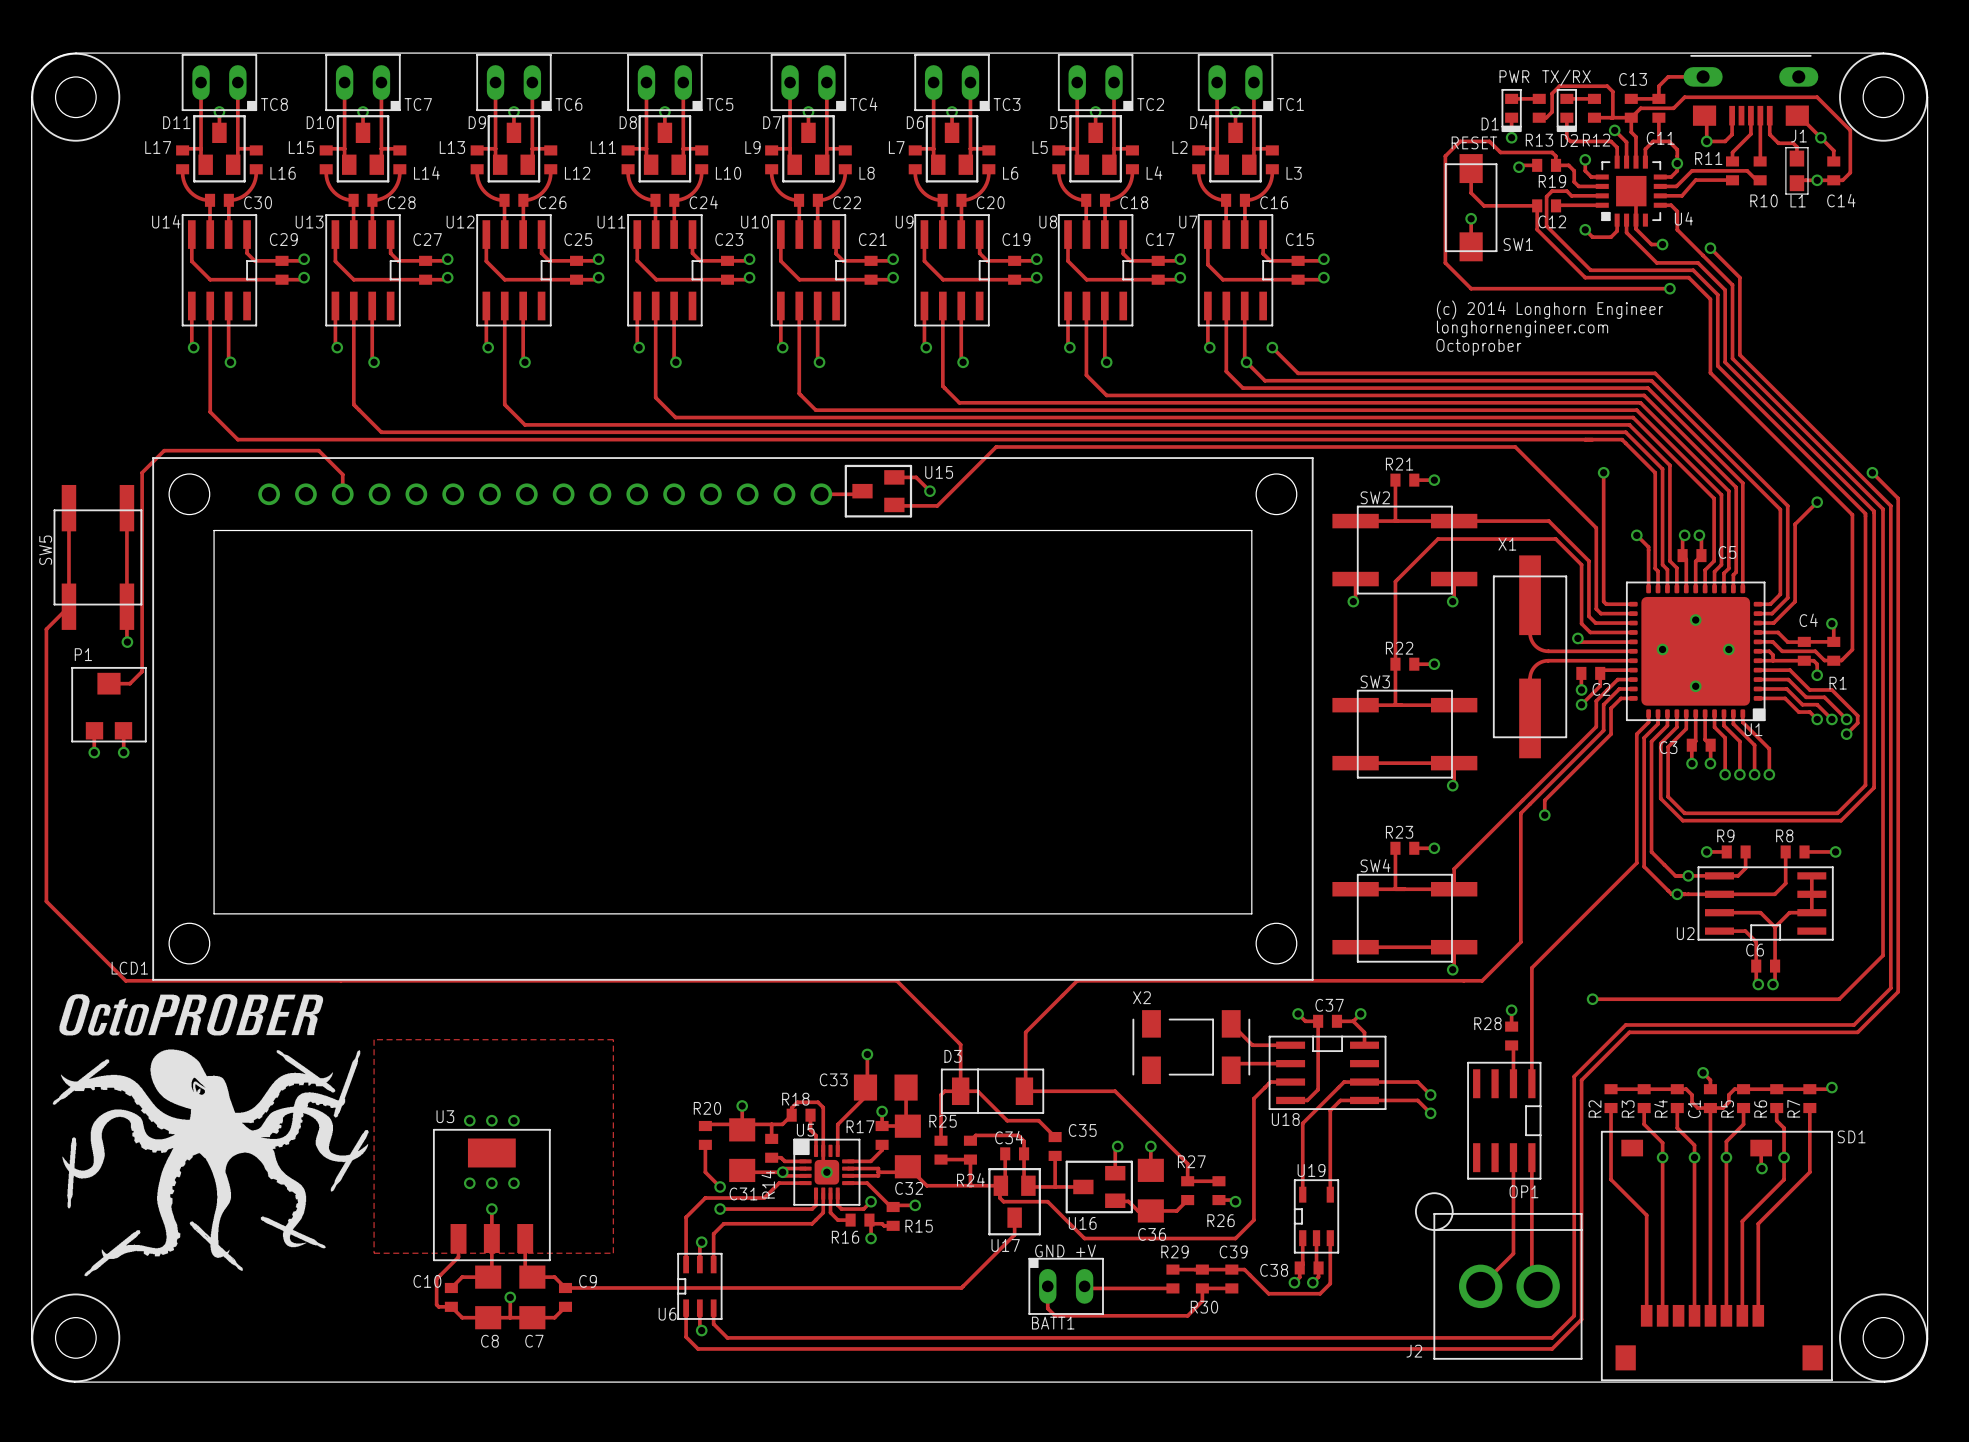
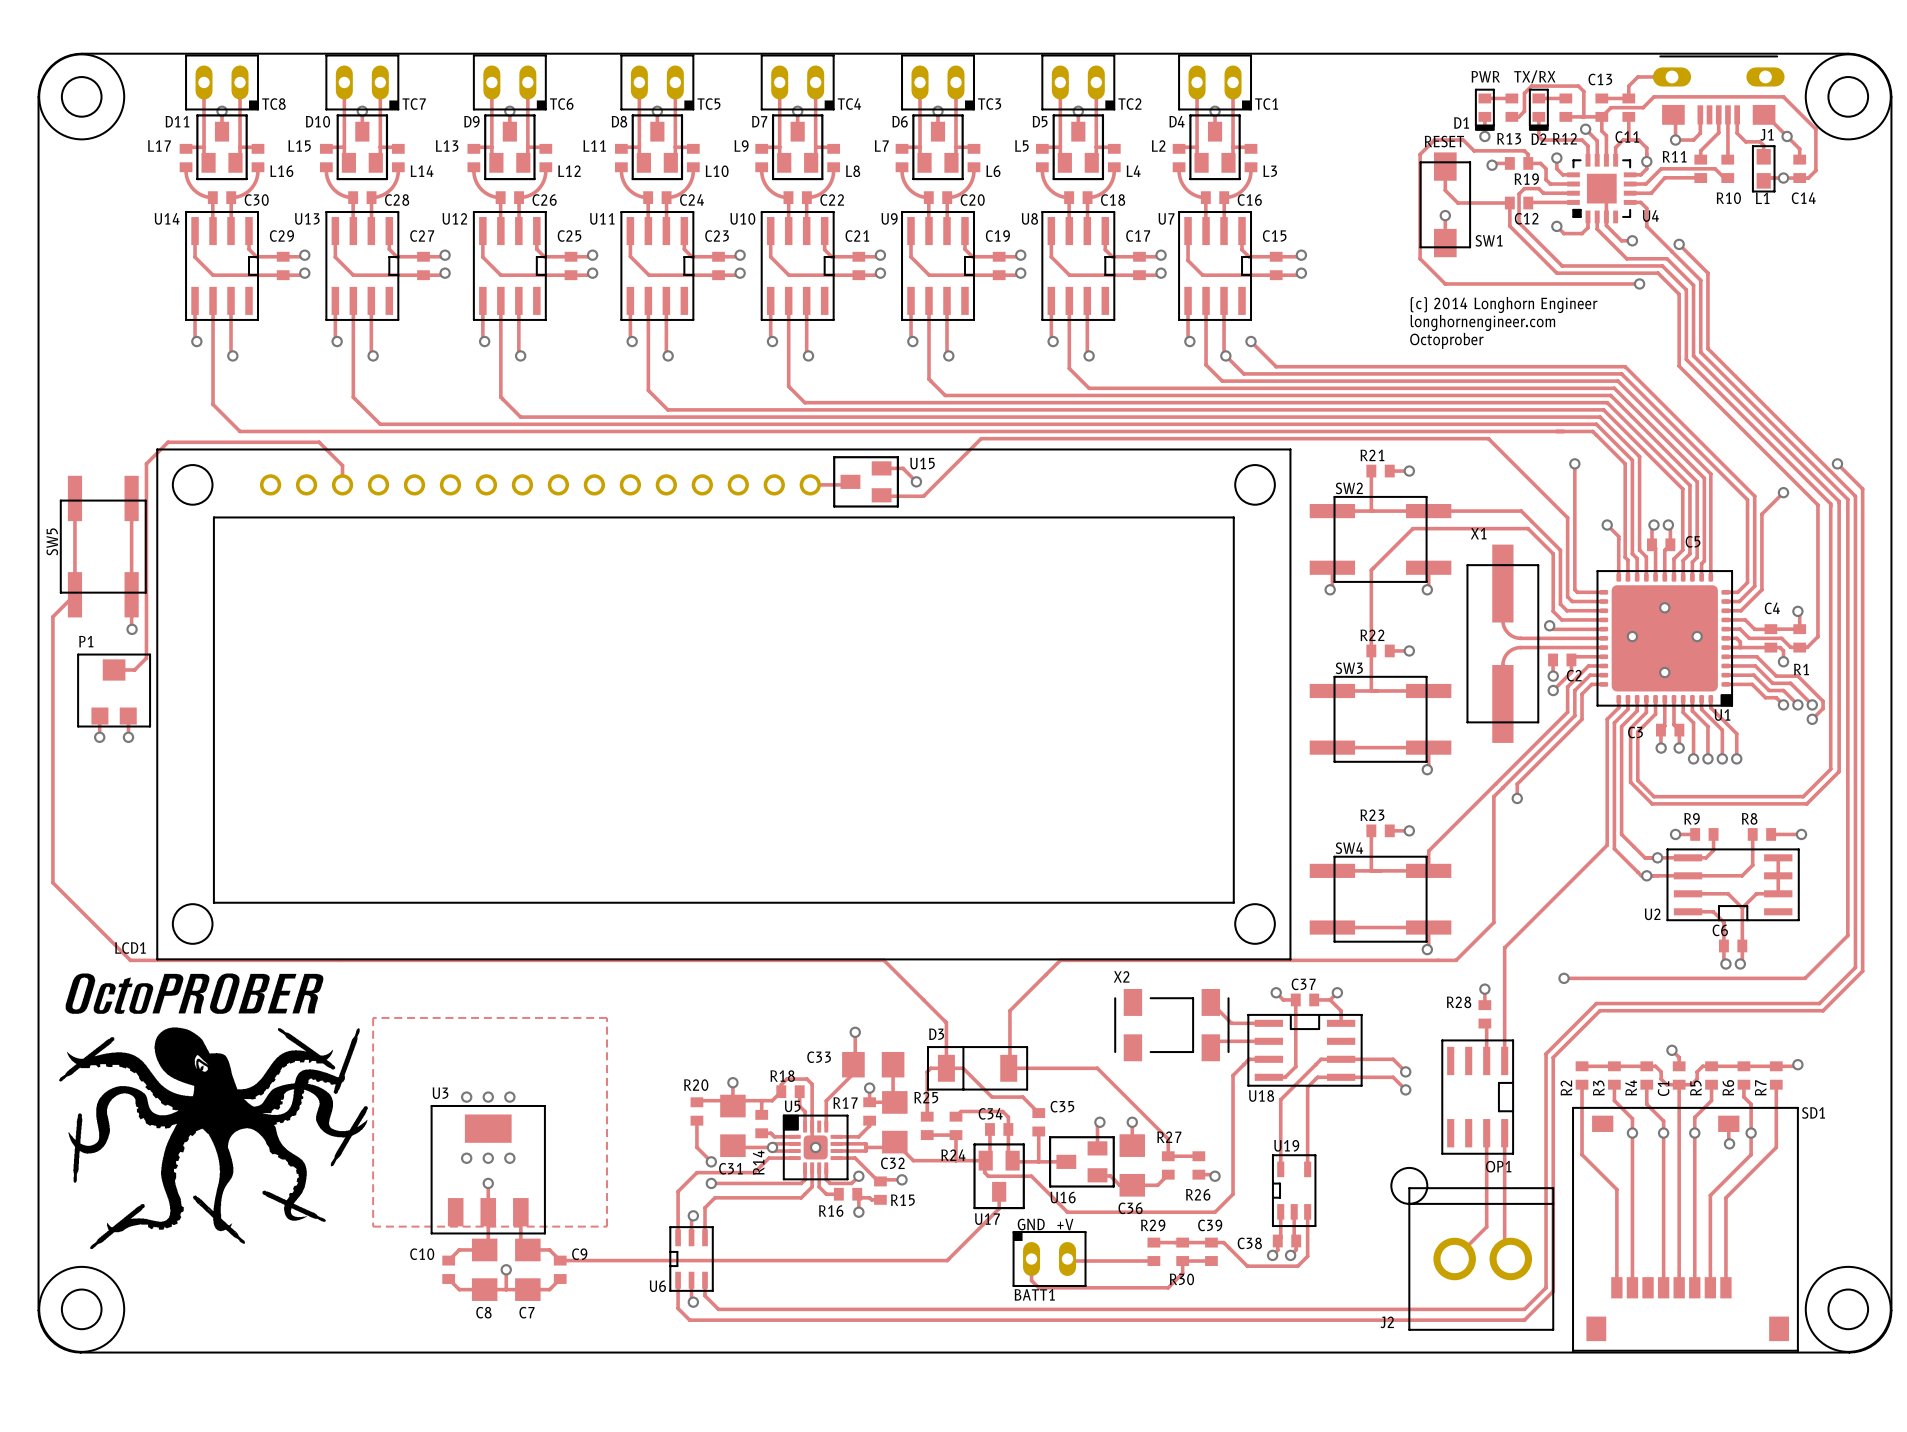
LCD1 footprint: [152, 457, 1314, 981] -> [156, 448, 1292, 961]
track: (458, 1238) (458, 1257) (436, 1279) (436, 1304) (438, 1306) (451, 1306) -> none

